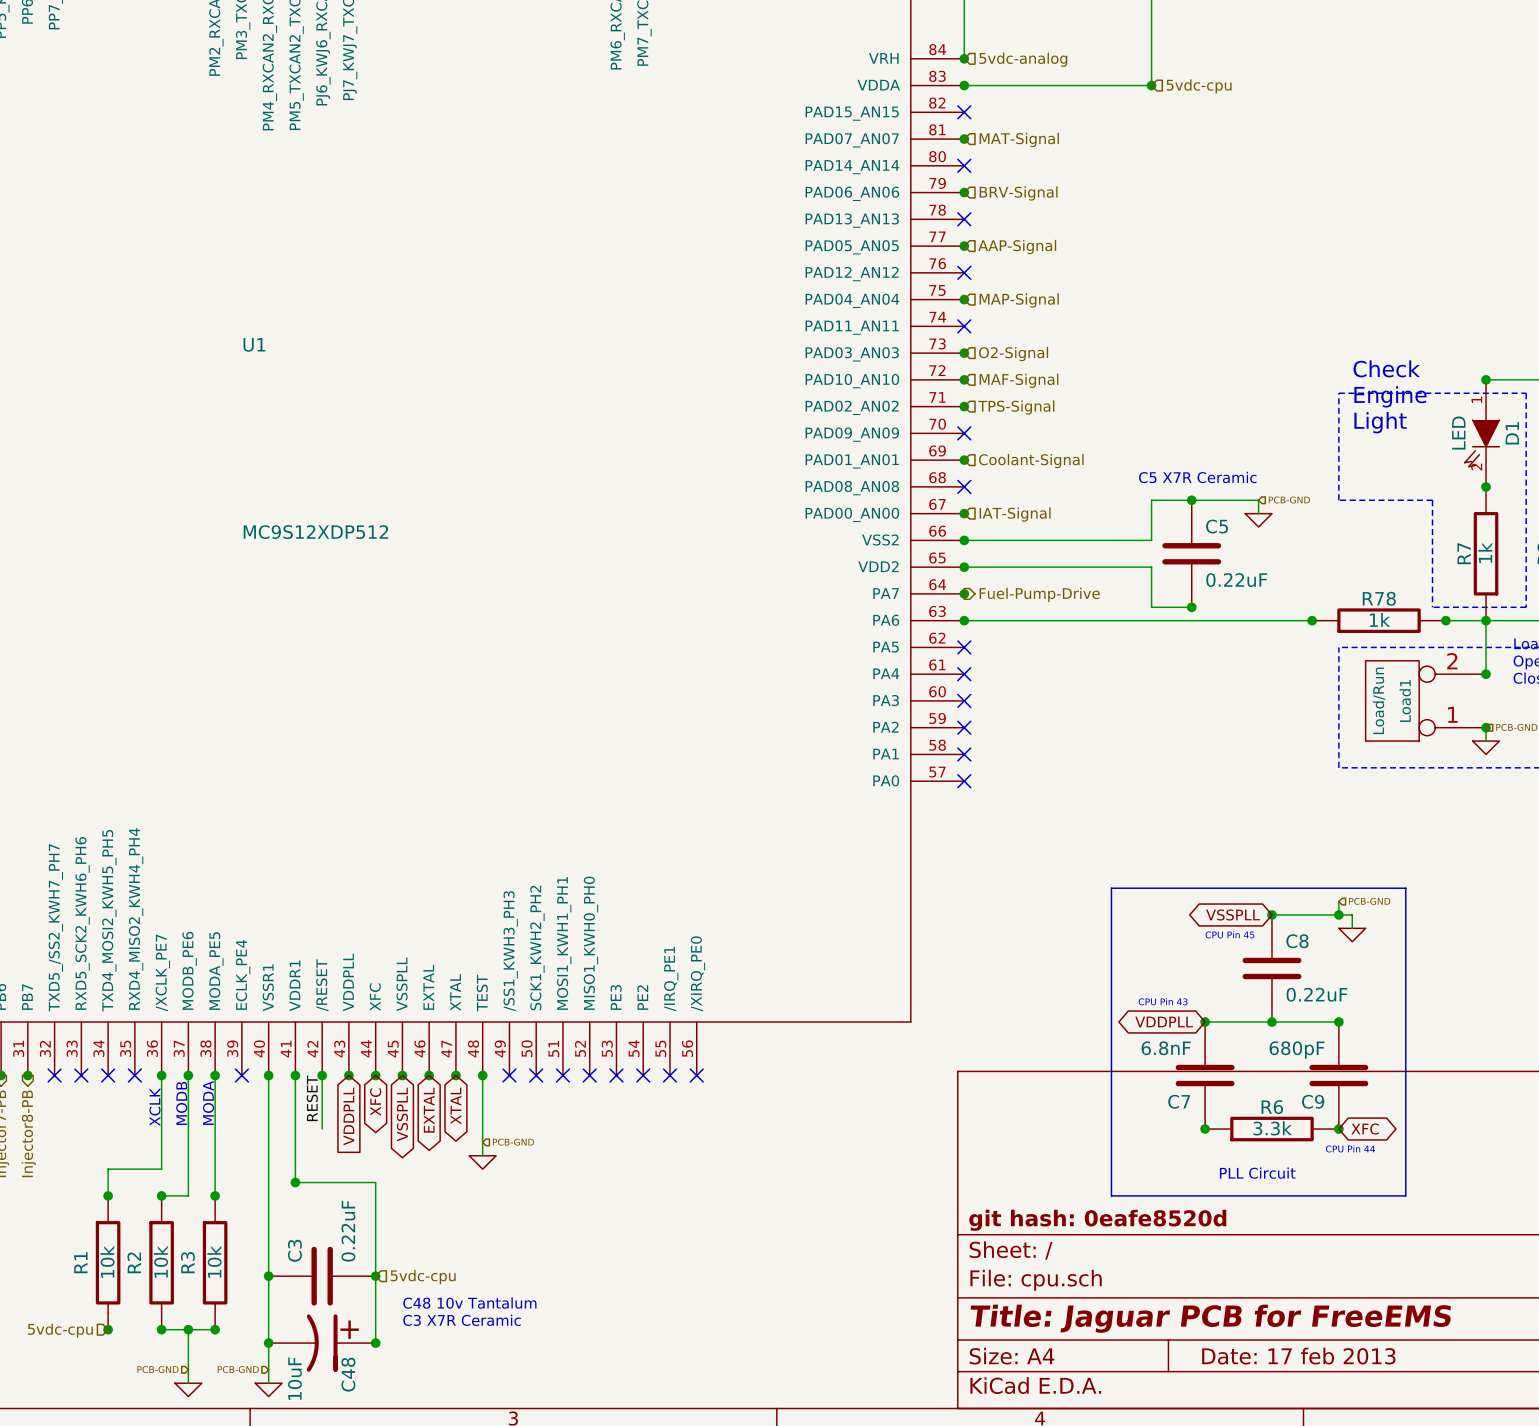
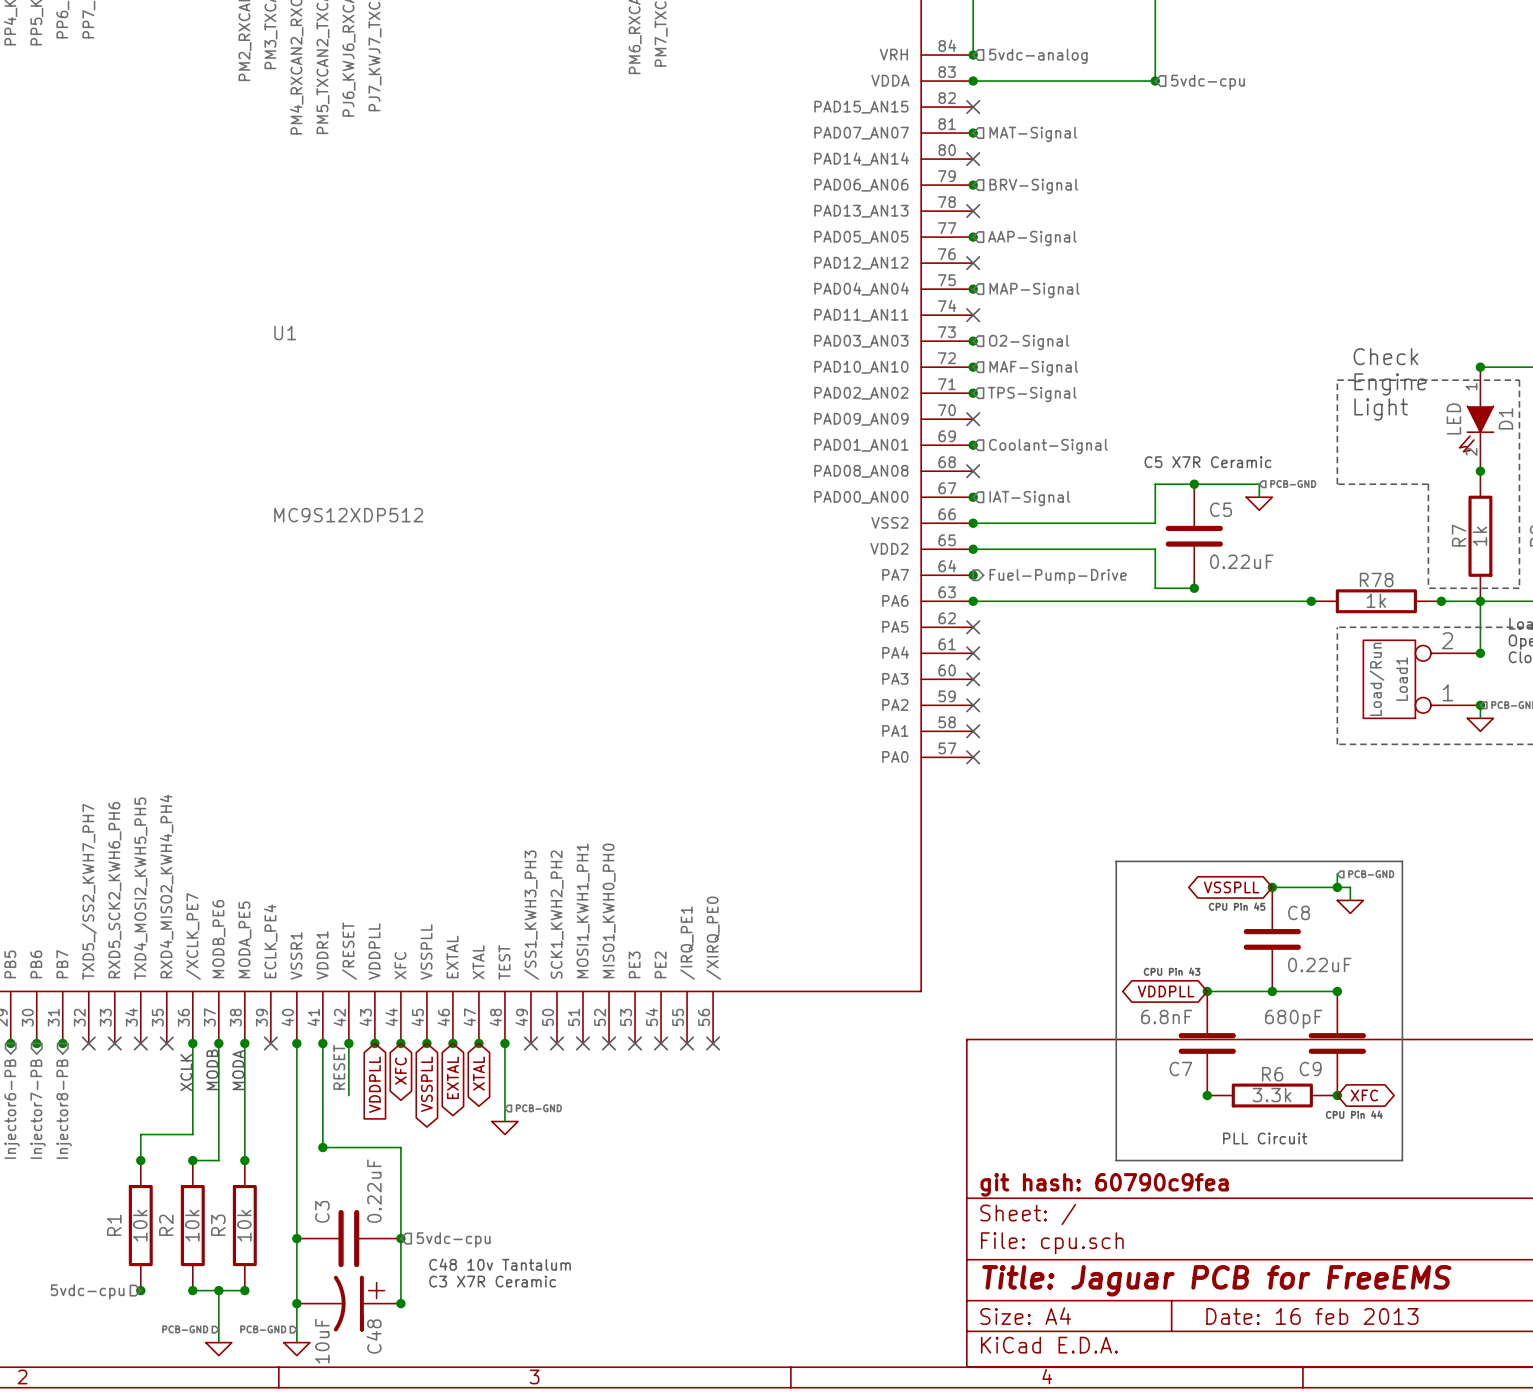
title block: git hash: 0eafe8520d (1097, 1220) -> git hash: 60790c9fea (1104, 1184)
title block: Date: 17 feb 2013 (1298, 1356) -> Date: 16 feb 2013 (1312, 1316)

